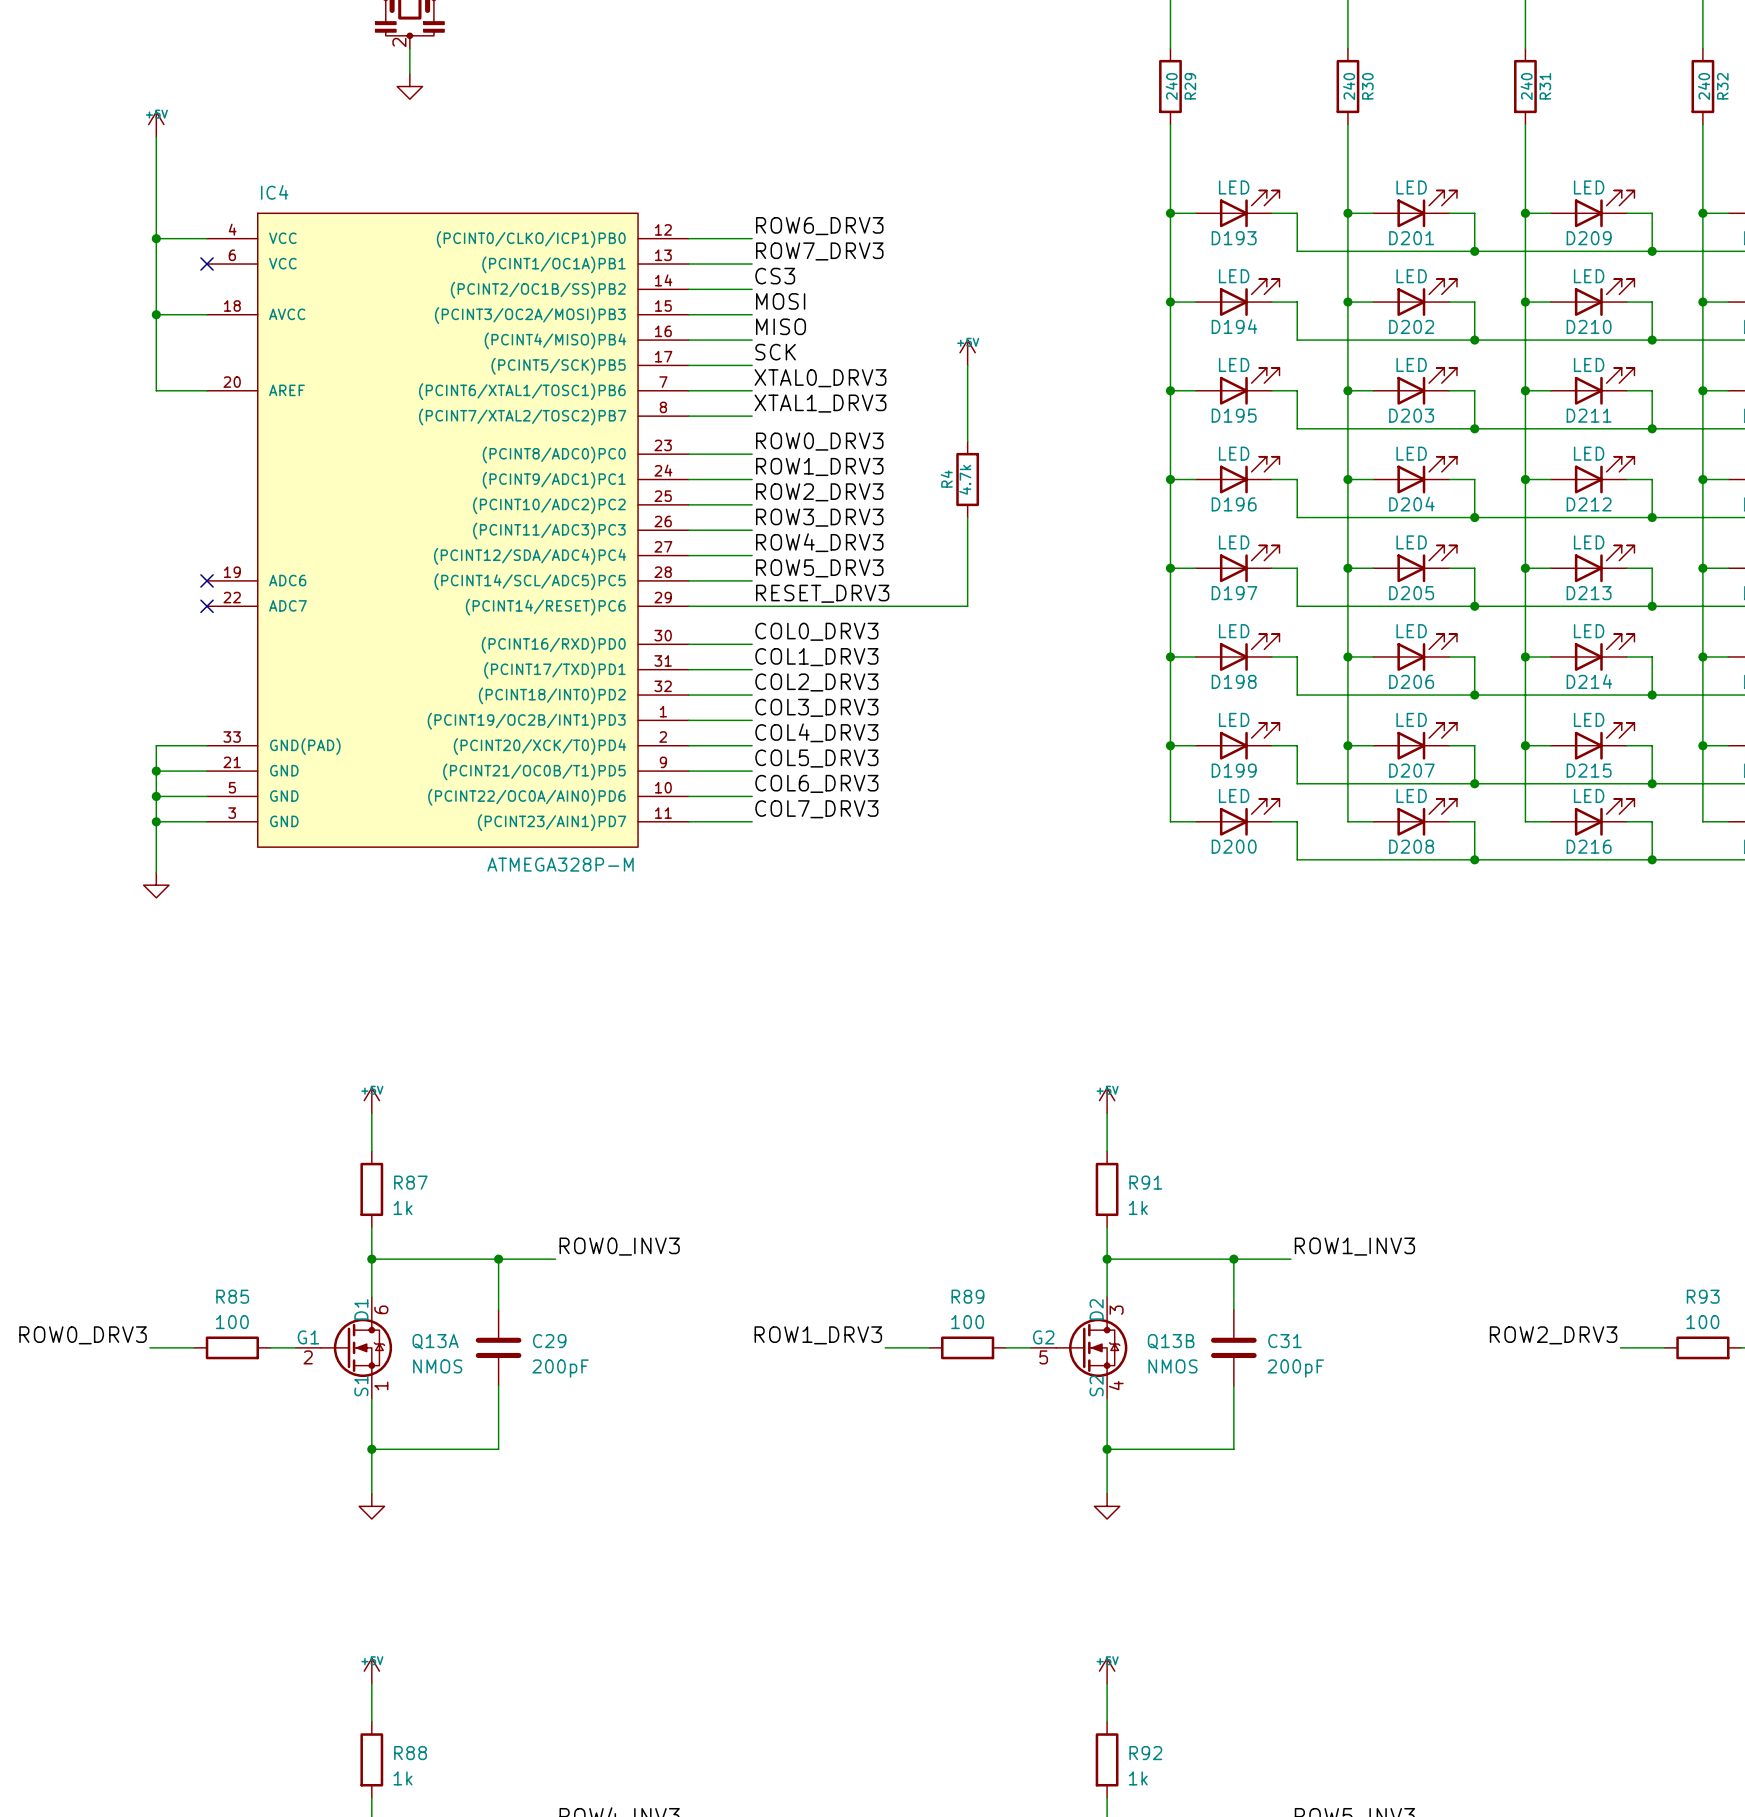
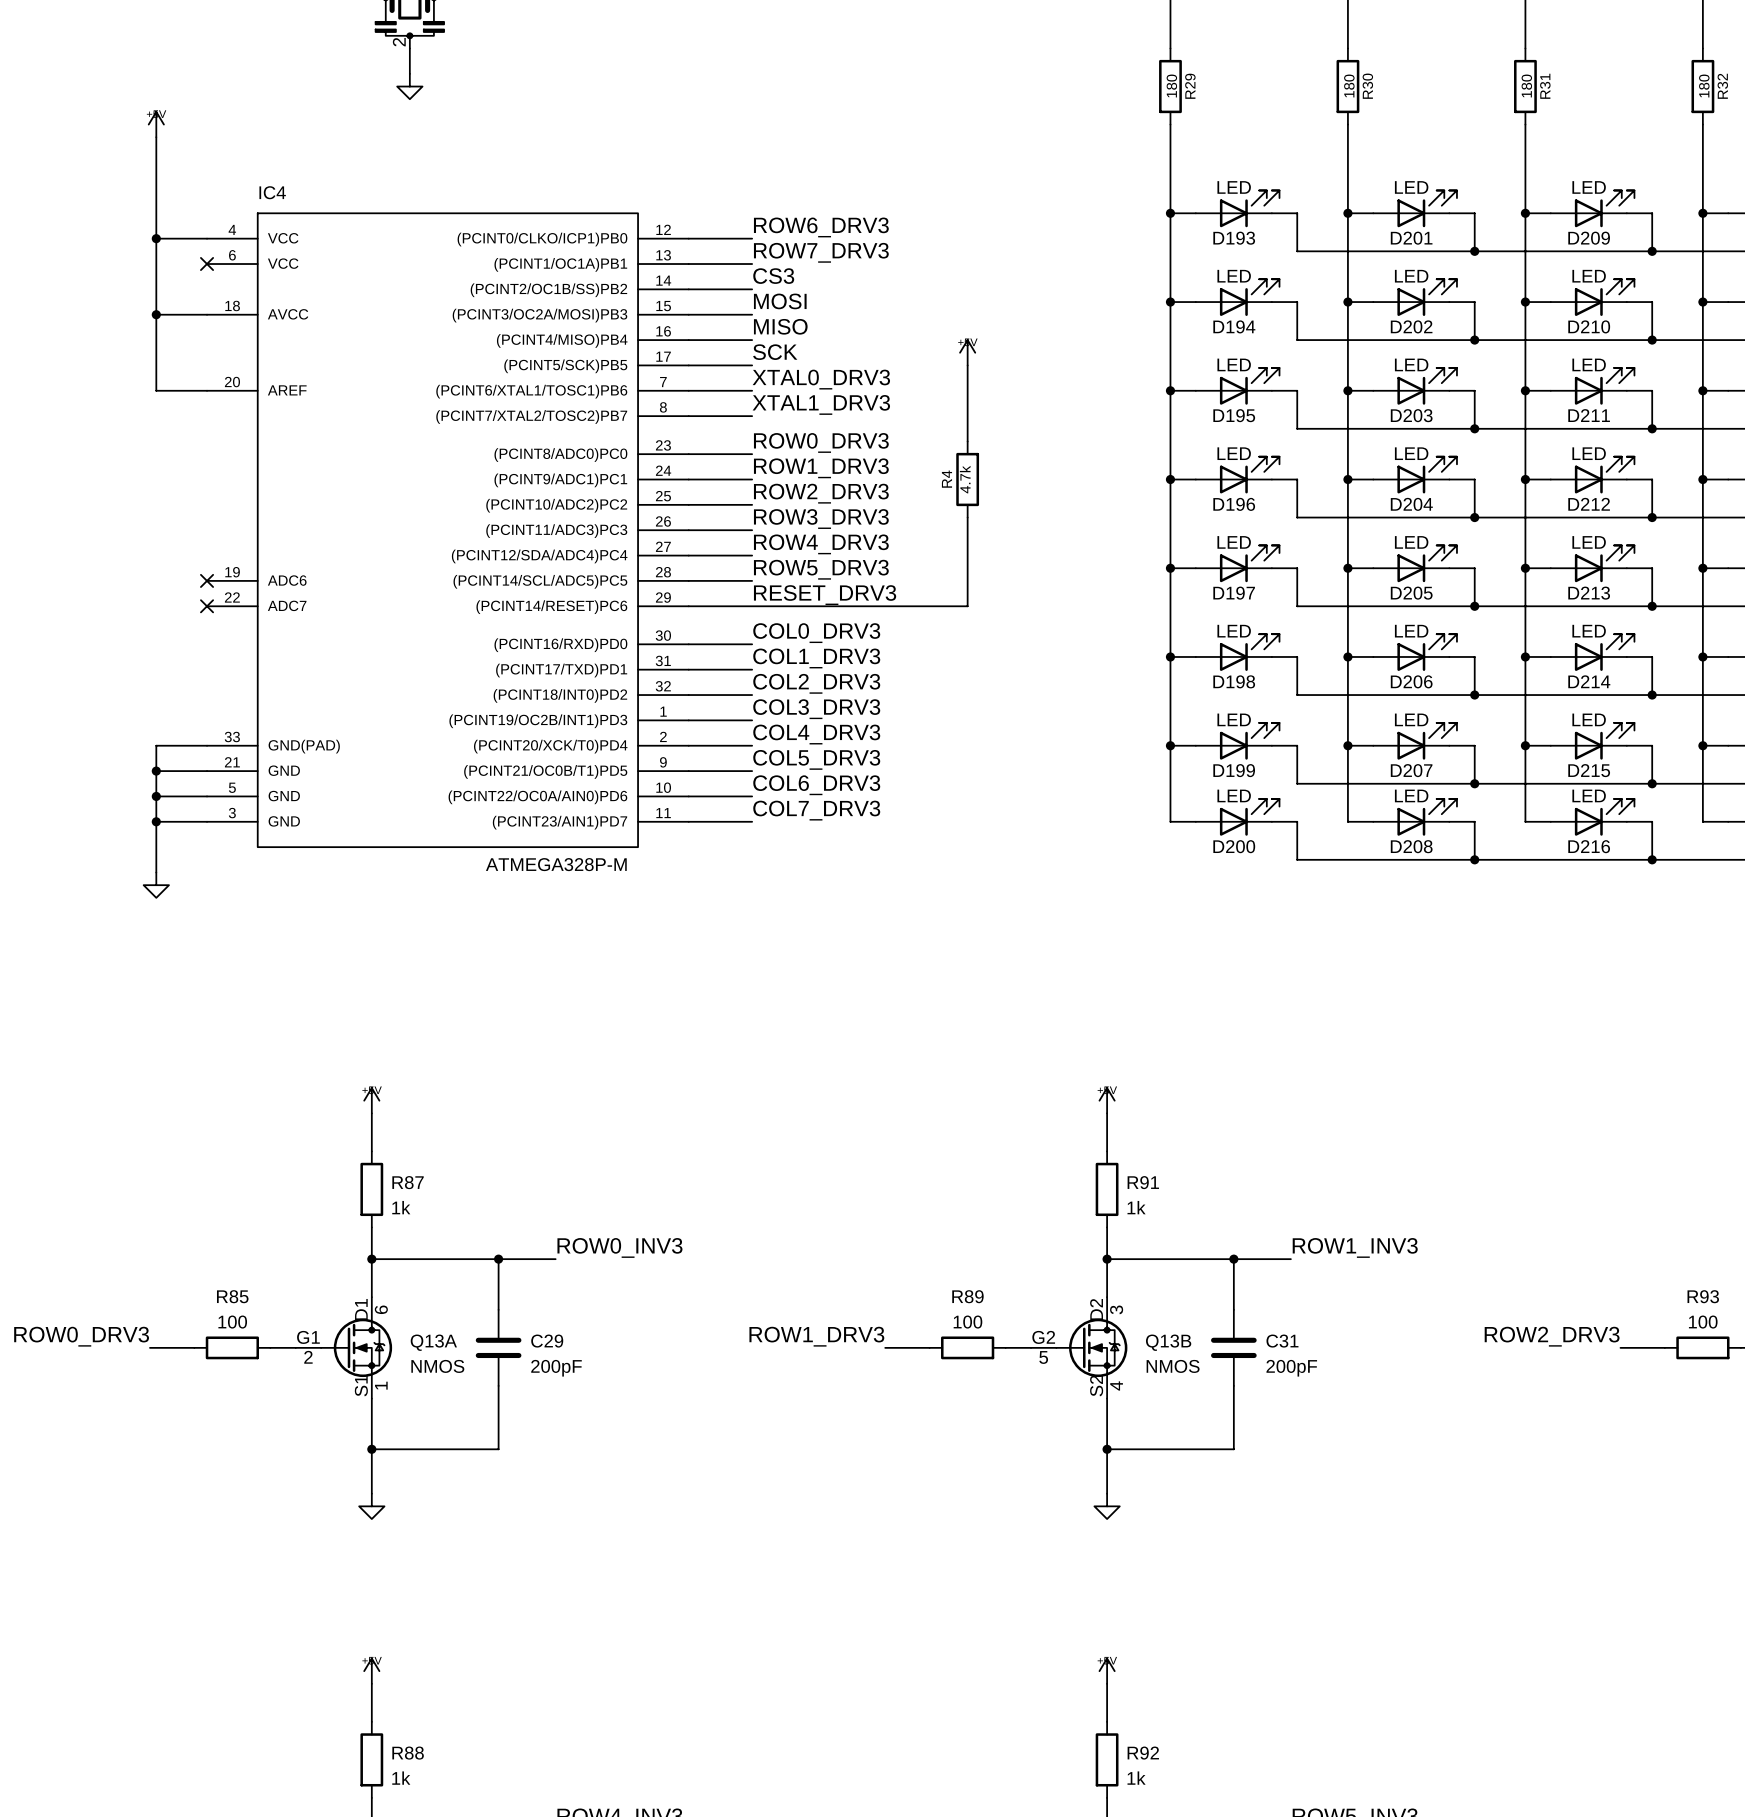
R29 value: 240 (1171, 86) -> 180 (1171, 86)
R30 value: 240 (1349, 86) -> 180 (1349, 86)
R31 value: 240 (1526, 86) -> 180 (1526, 86)
R32 value: 240 (1704, 86) -> 180 (1704, 86)

